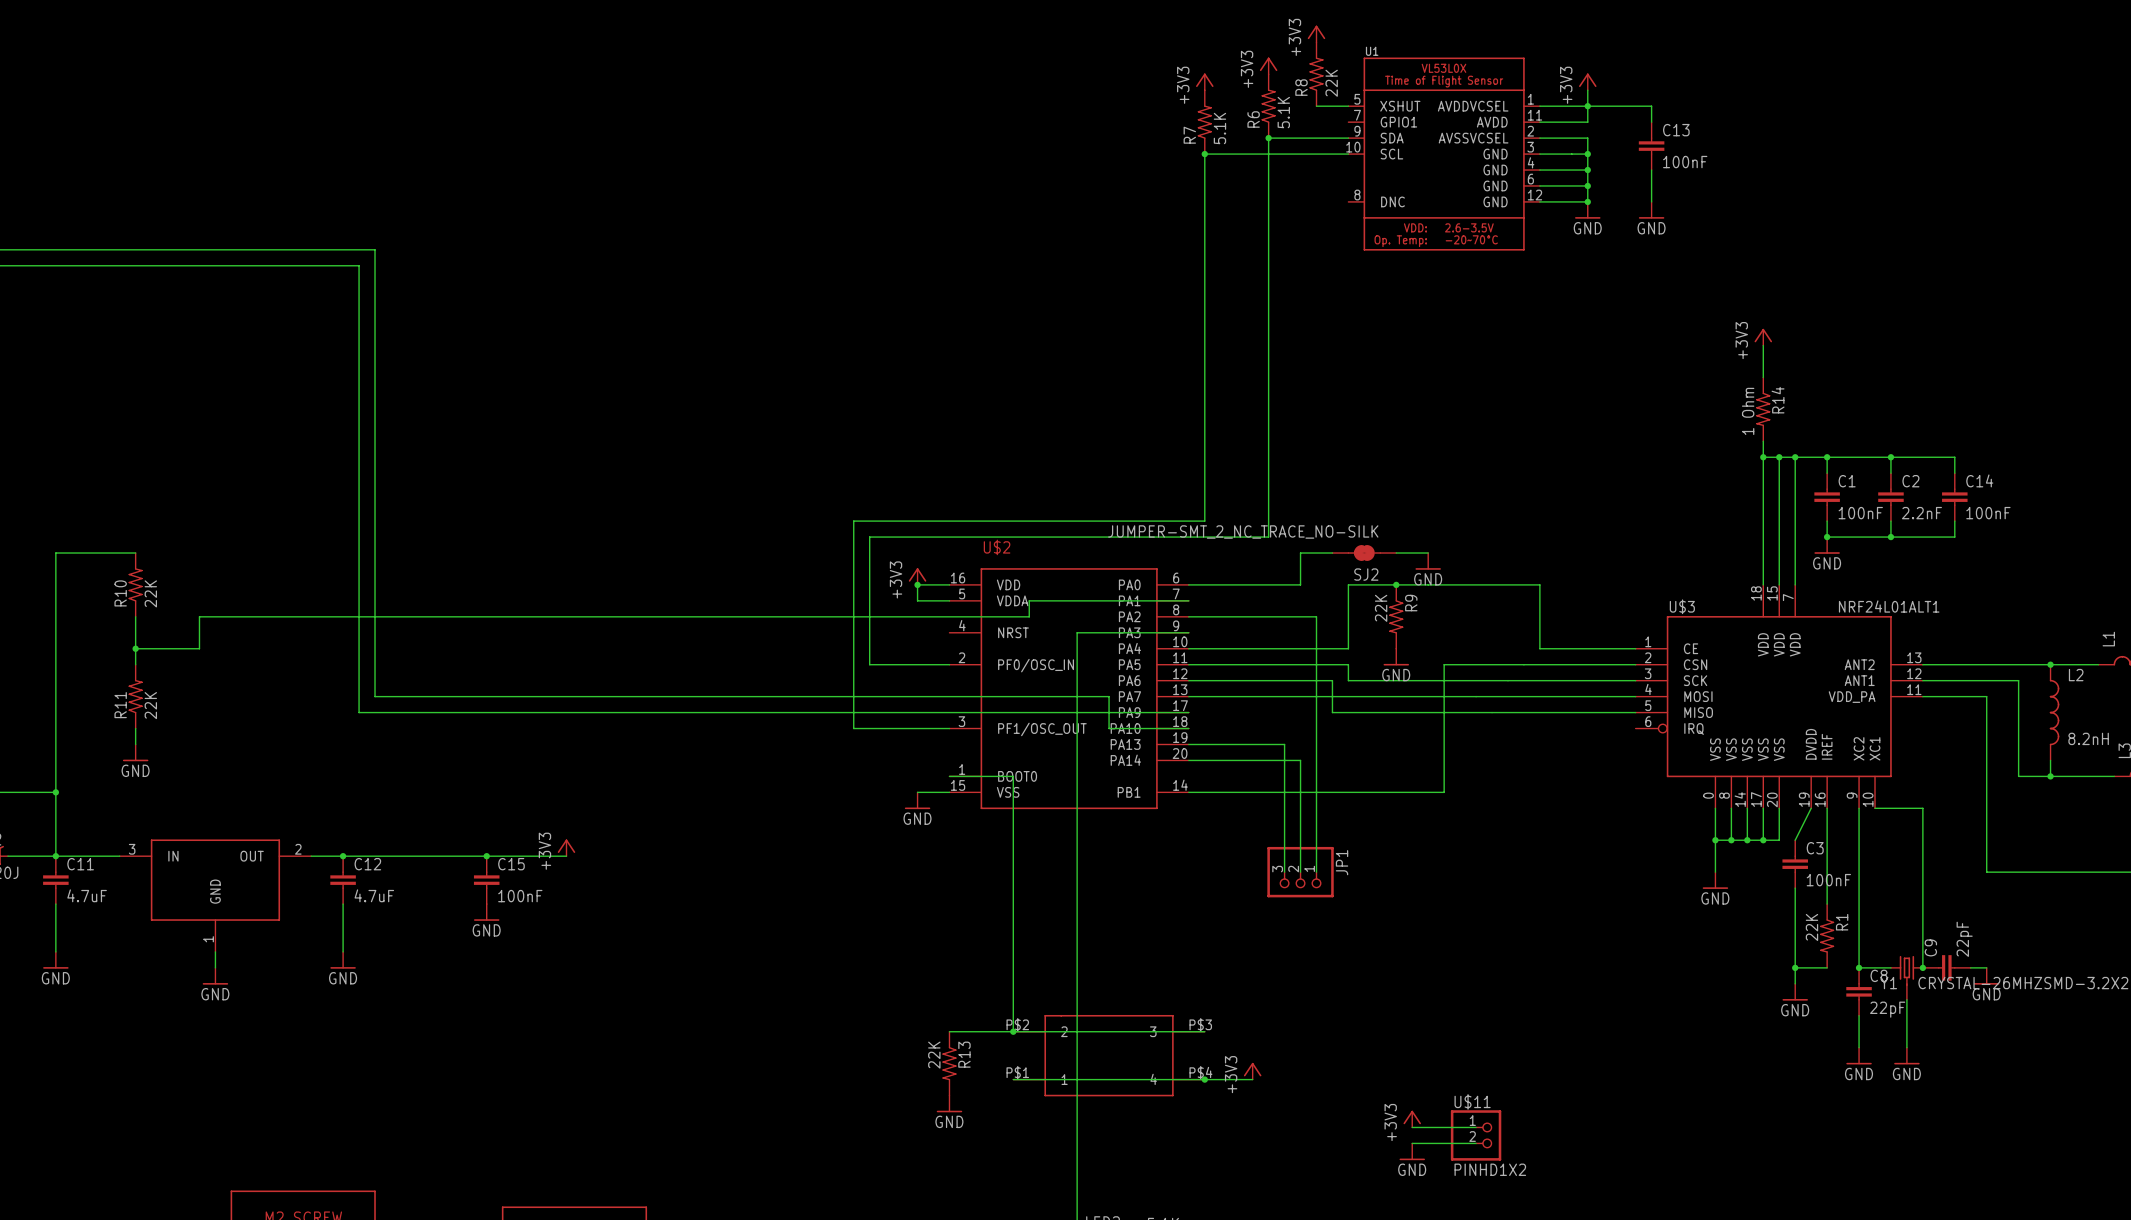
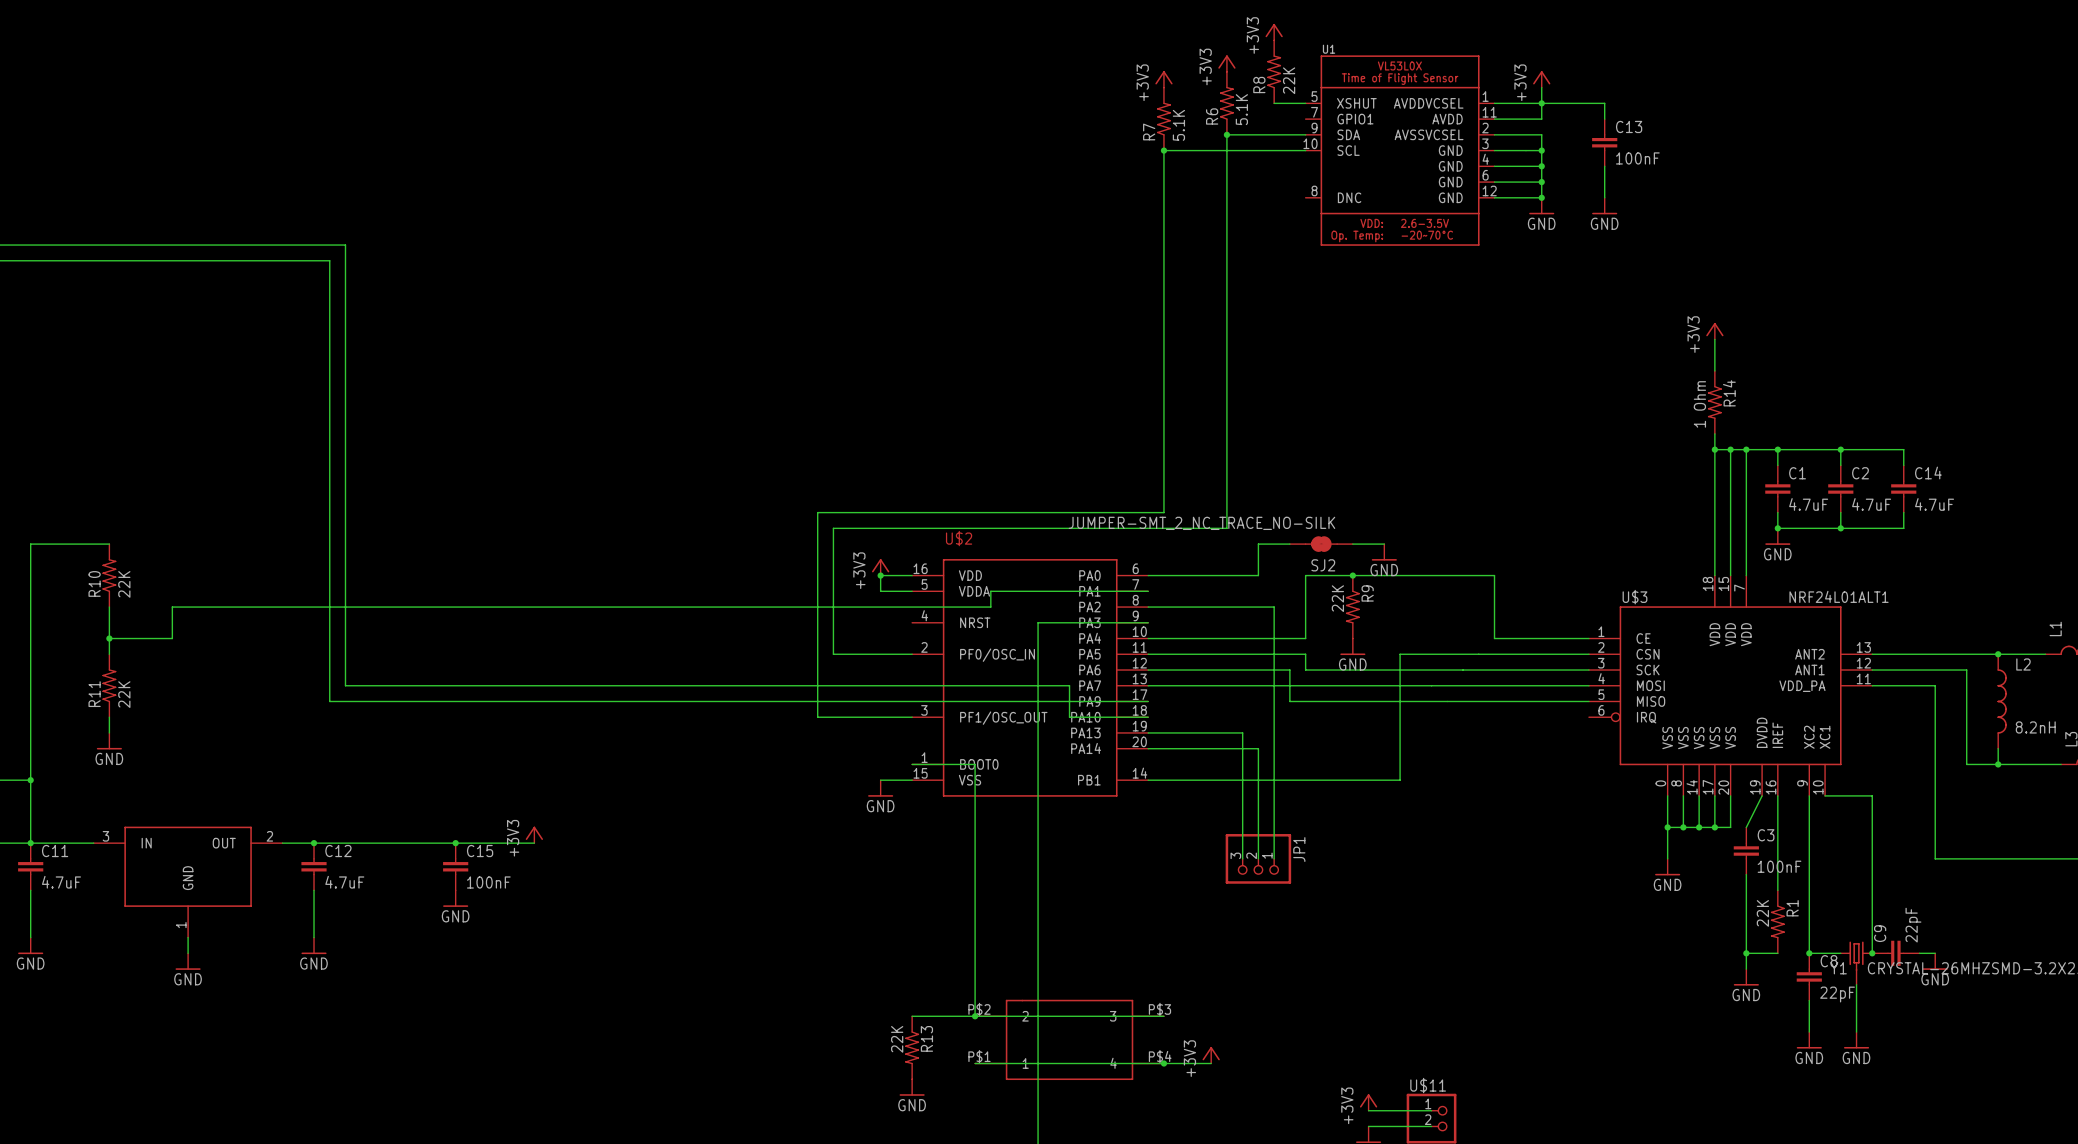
C1 value: 100nF (1860, 513) -> 4.7uF (1808, 504)
C2 value: 2.2nF (1921, 513) -> 4.7uF (1871, 504)
C14 value: 100nF (1988, 513) -> 4.7uF (1934, 504)

